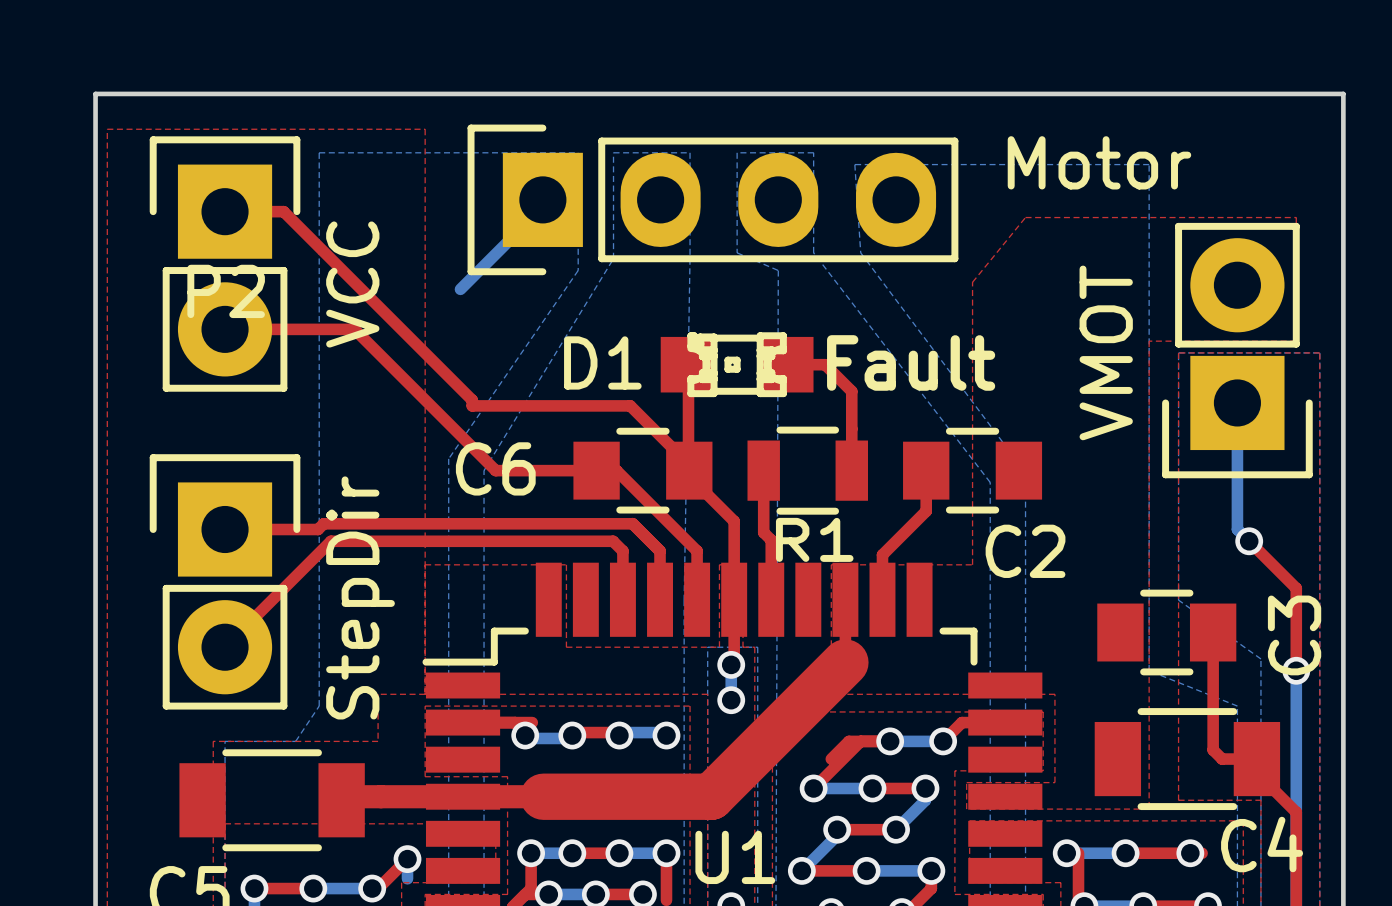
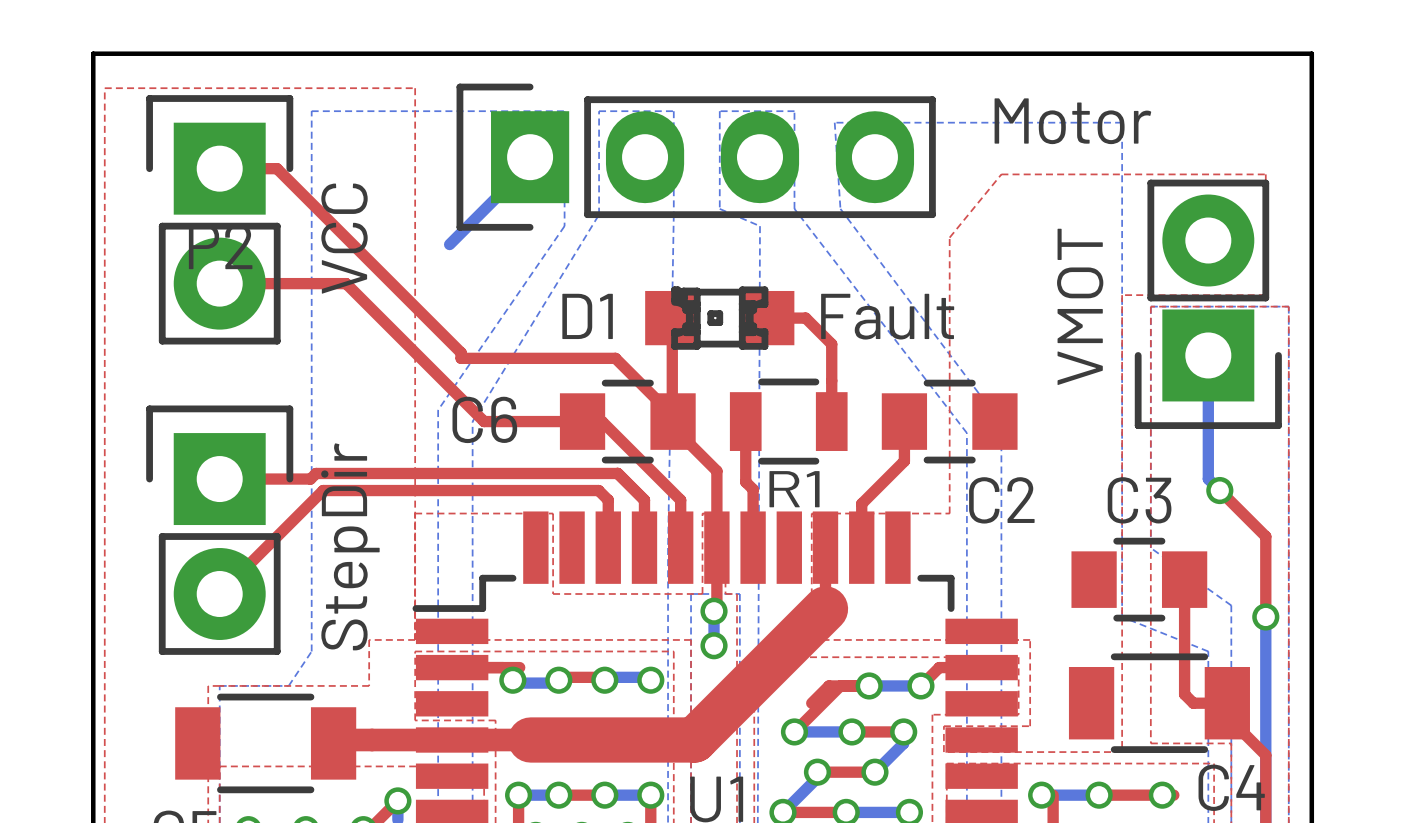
C3 name rotation: 0° (1294, 635) -> 90° clockwise (1139, 500)
C3 name position: C3 (1294, 635) -> C3 (1139, 500)

